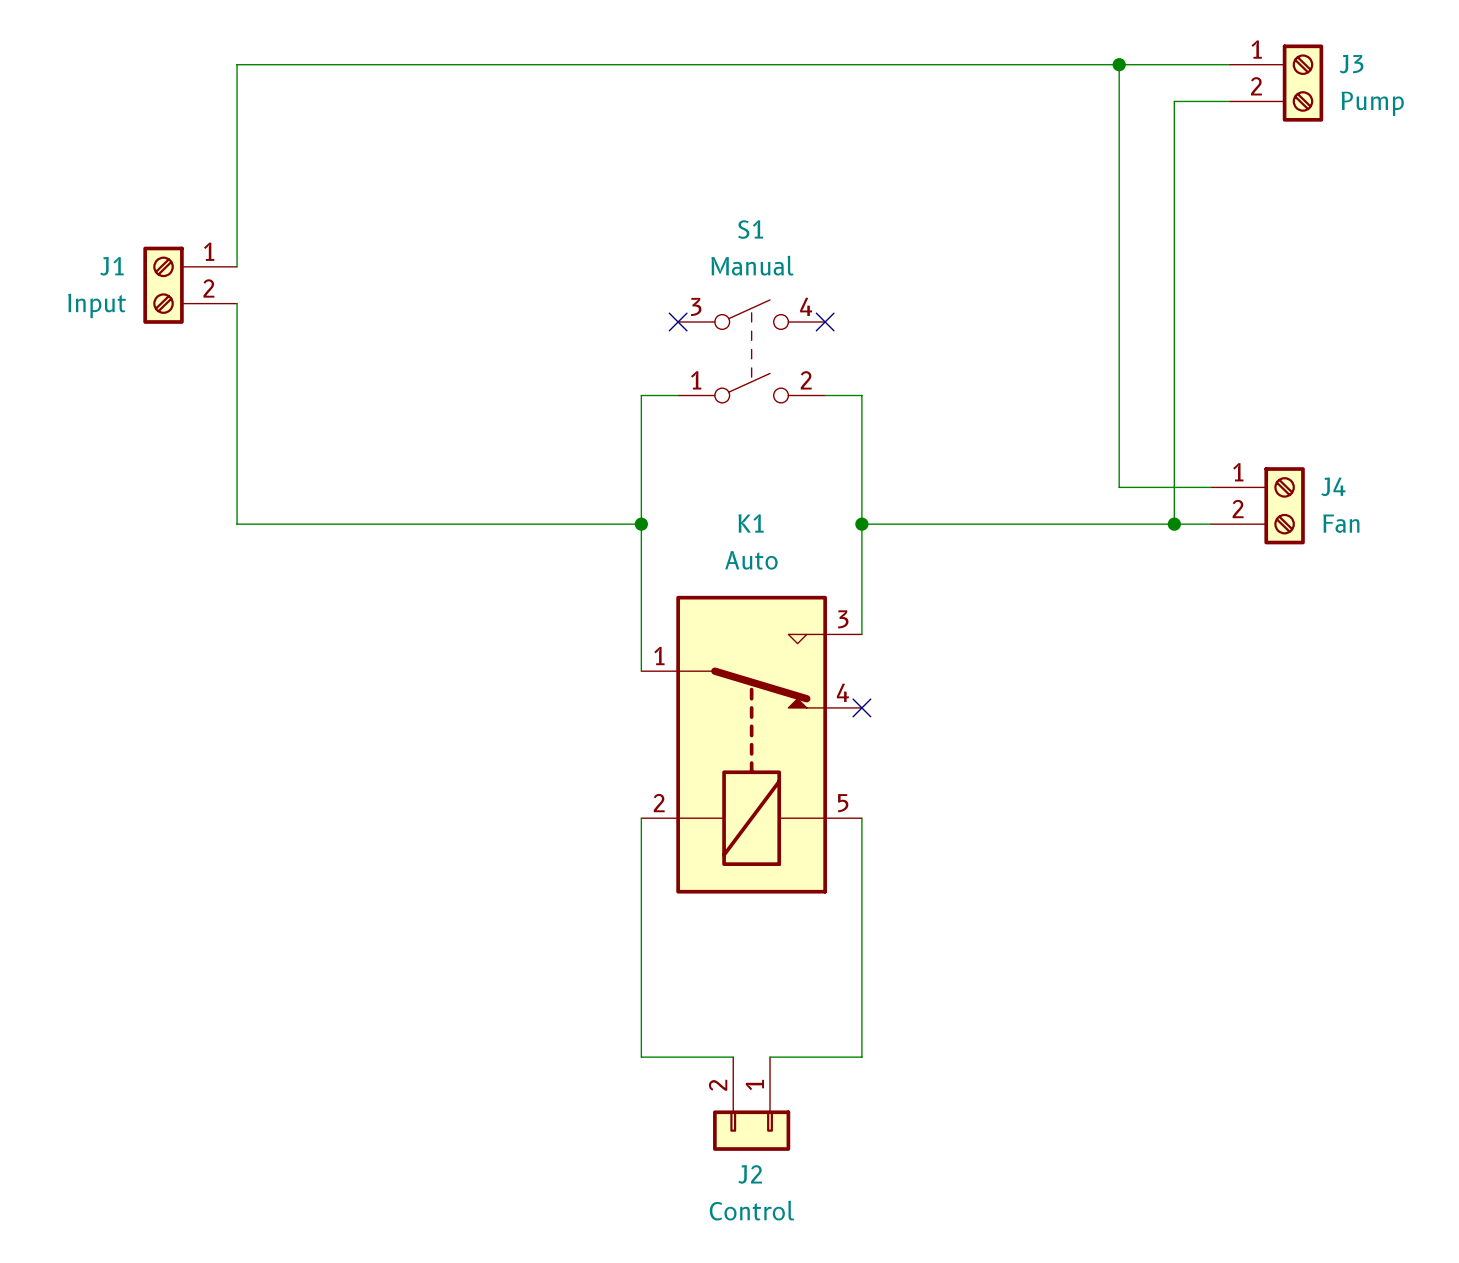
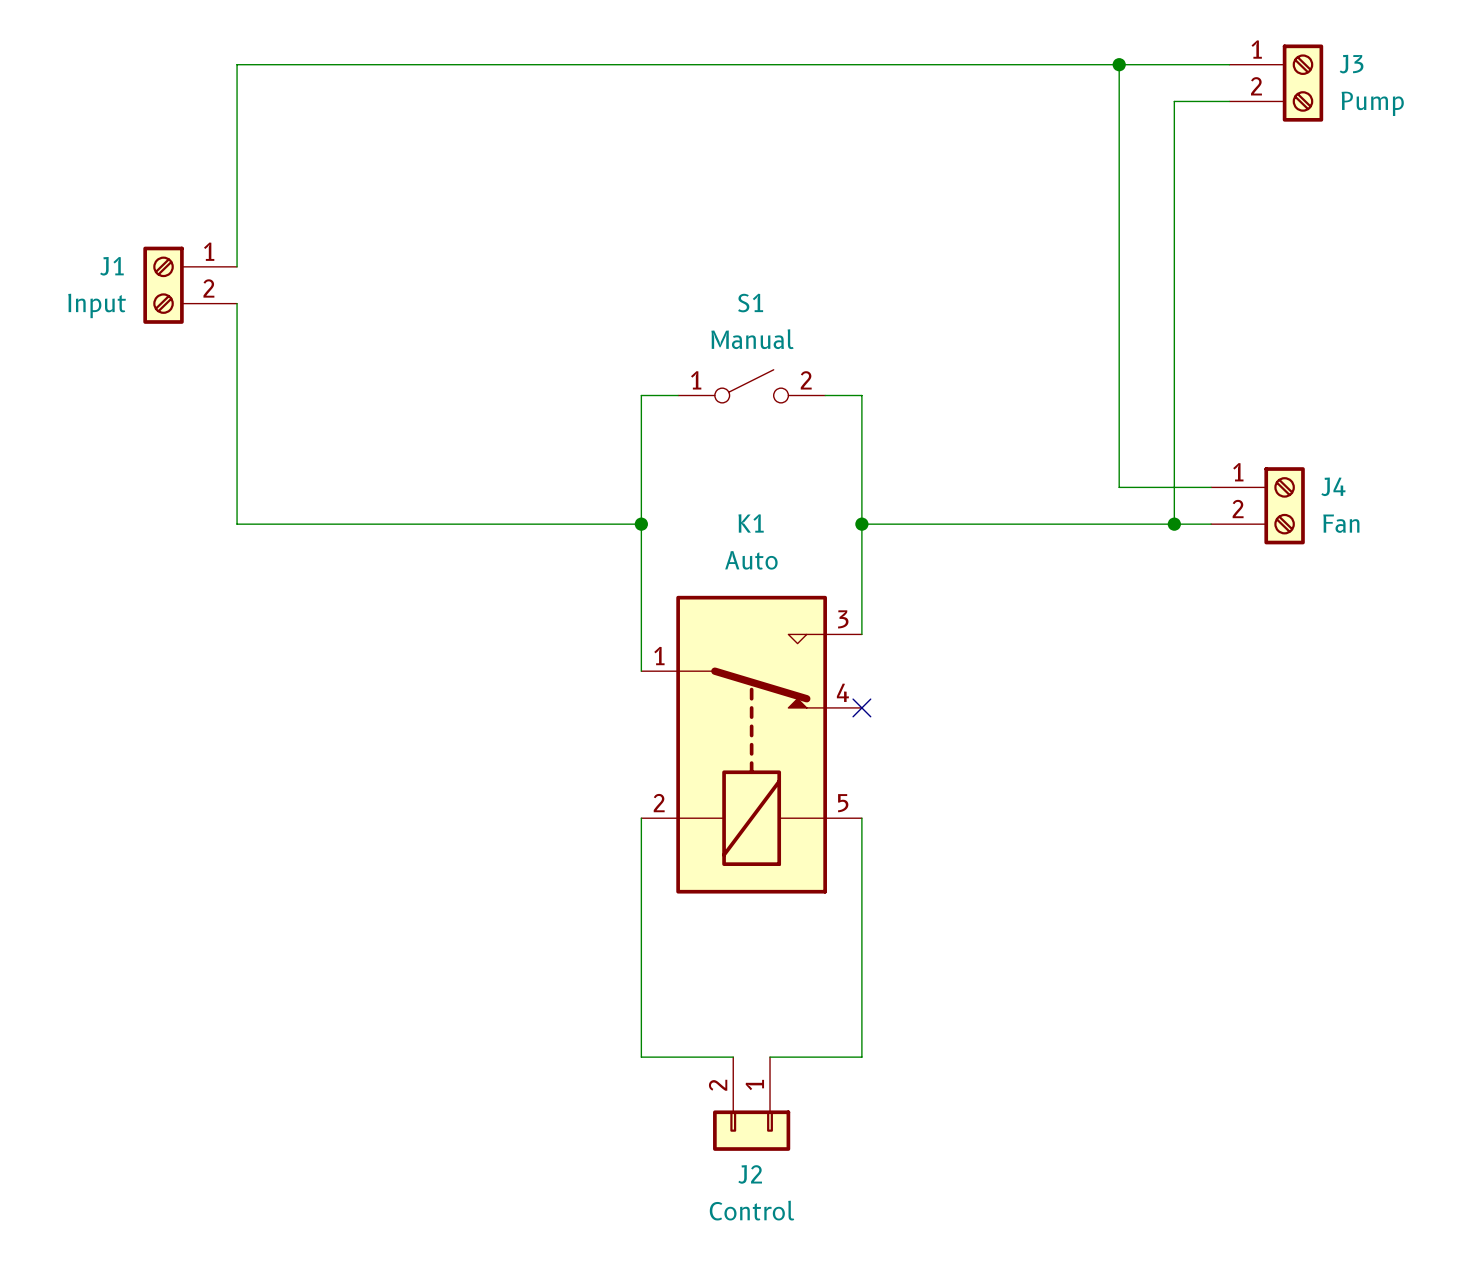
S1 name position: S1 (750, 229) -> S1 (750, 303)
S1 value position: Manual (752, 265) -> Manual (752, 339)
S1 symbol: [678, 299, 826, 403] -> [678, 369, 826, 403]
no-connect mark: (678, 321) -> none
no-connect mark: (825, 321) -> none

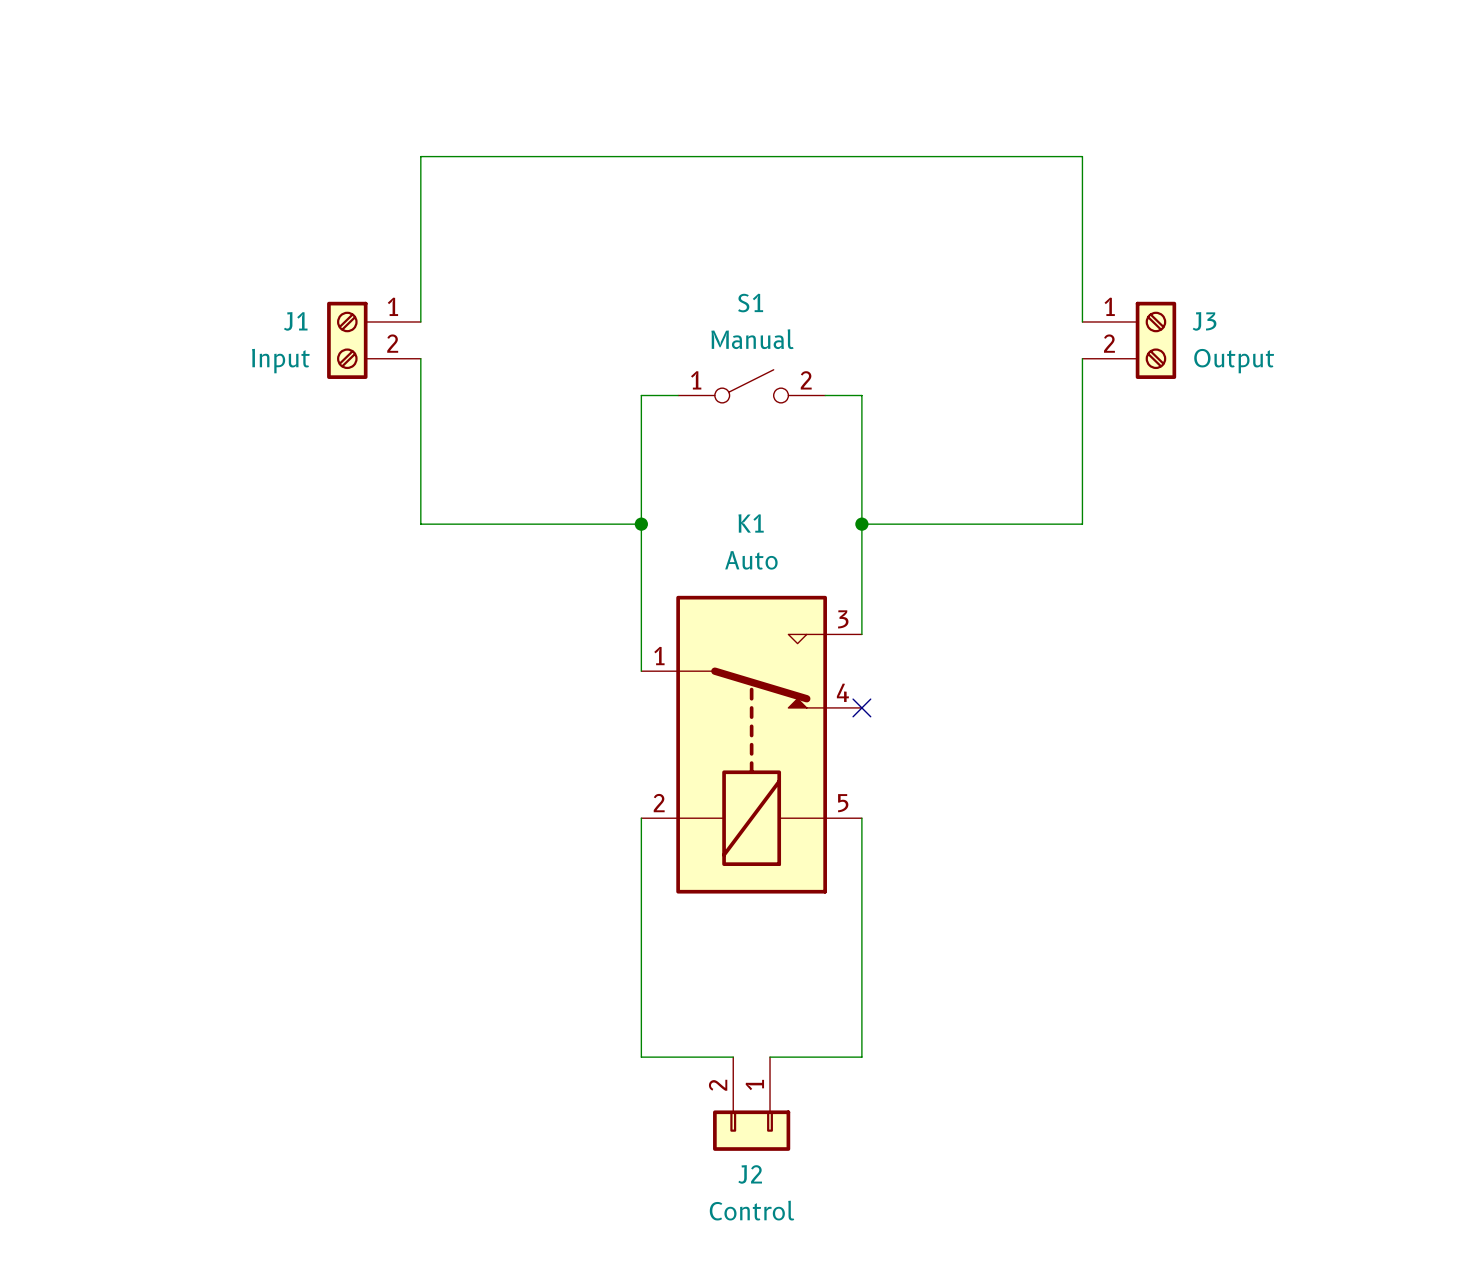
wire: (1119, 64) (1119, 487) (1211, 487) -> none
junction: (1119, 64) -> none
wire: (1229, 64) (237, 64) (237, 266) -> none
J3 position: (1276, 83) -> (1129, 340)
wire: (1229, 101) (1174, 101) (1174, 524) -> none
J3 value: Pump (1372, 103) -> Output (1234, 361)
J1 position: (190, 285) -> (373, 340)
wire: (237, 303) (237, 524) (420, 524) -> (420, 358) (420, 524)
wire: none -> (420, 321) (420, 156) (1082, 156) (1082, 321)
J4: Fan (1257, 505) -> none
wire: (1082, 524) (1211, 524) -> (1082, 524) (1082, 358)
junction: (1174, 524) -> none

